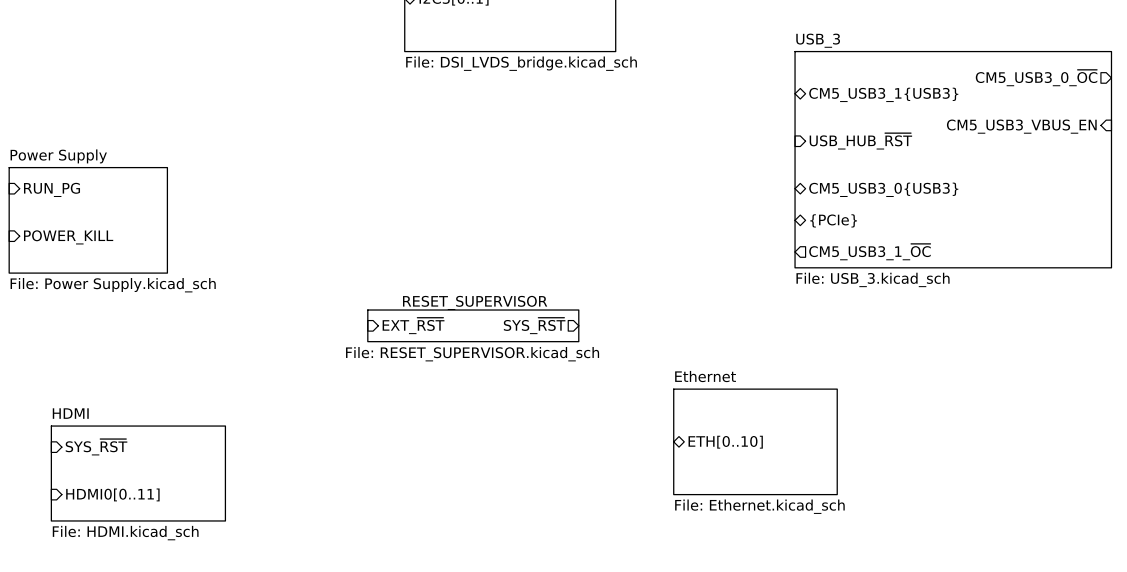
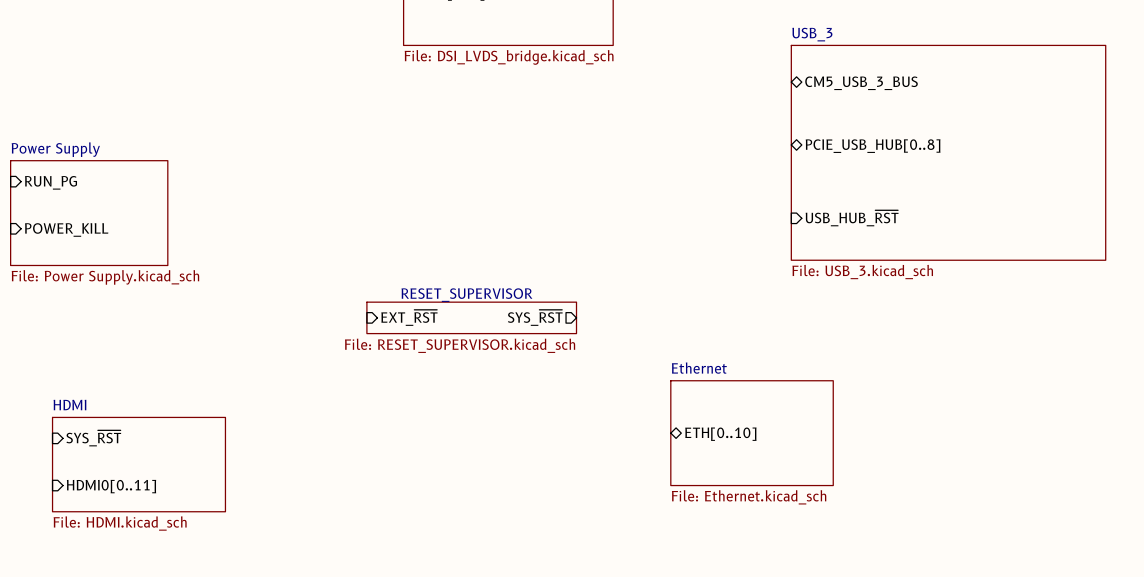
sheet pin: CM5_USB3_0_~{OC} (1036, 78) -> none
sheet pin: CM5_USB3_1{USB3} (883, 94) -> CM5_USB_3_BUS (861, 83)
sheet pin: CM5_USB3_VBUS_EN (1021, 126) -> none
sheet pin position: USB_HUB_~{RST} (860, 141) -> USB_HUB_~{RST} (852, 218)
sheet pin: none -> PCIE_USB_HUB[0..8] (873, 146)
sheet pin: CM5_USB3_0{USB3} (883, 189) -> none
sheet pin: {PCIe} (833, 220) -> none
sheet pin: CM5_USB3_1_~{OC} (869, 252) -> none

